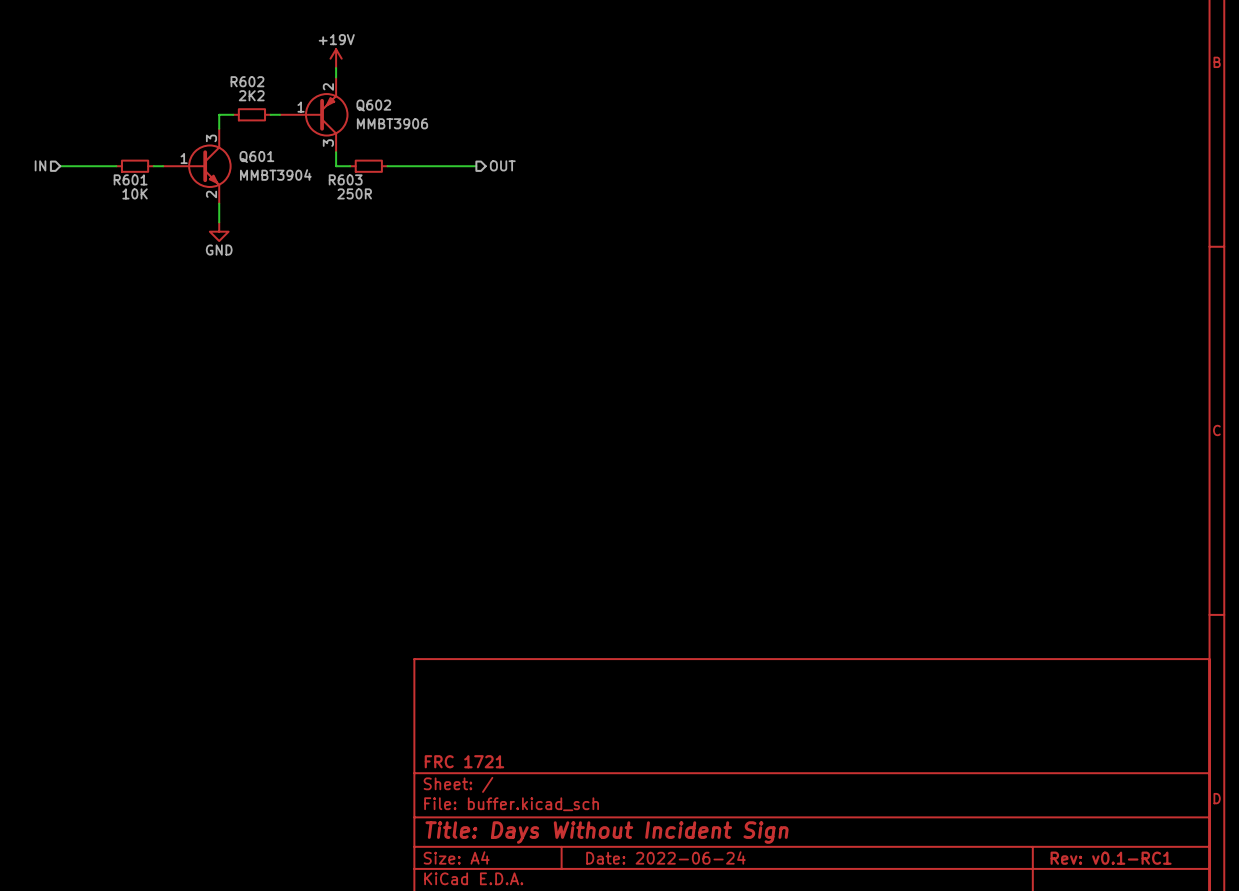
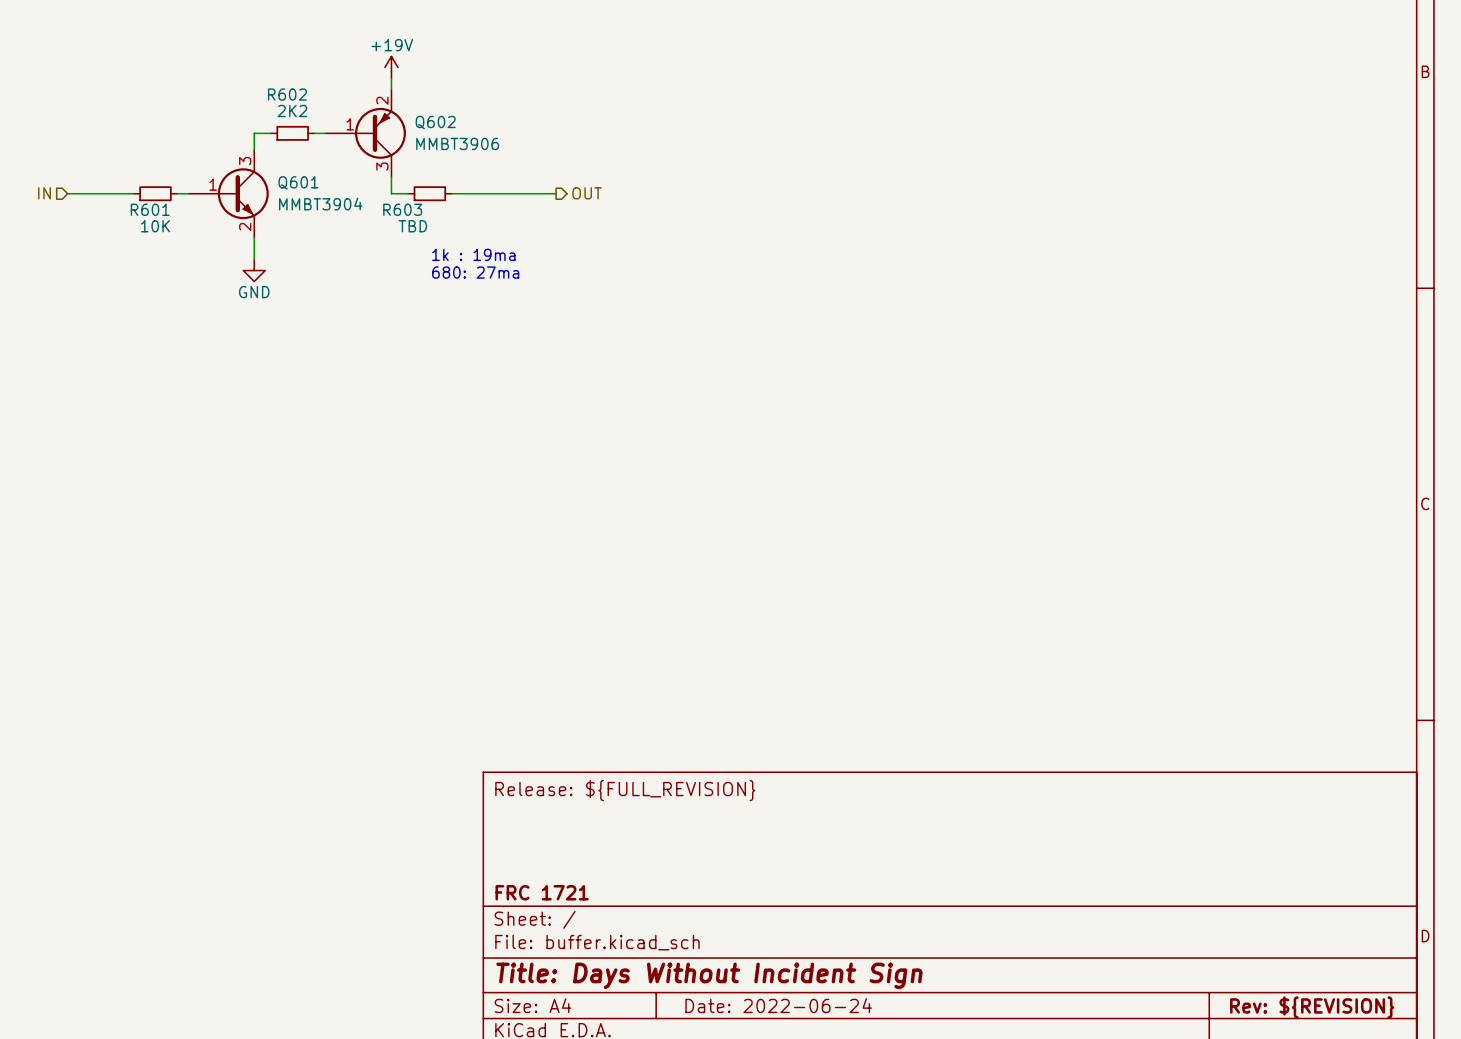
R603 value: 250R (354, 193) -> TBD (412, 226)
text: none -> 1k : 19ma (473, 254)
text: none -> 680: 27ma (475, 272)
title block: none -> Release: ${FULL_REVISION} (625, 790)
title block: Rev: v0.1-RC1 (1111, 858) -> Rev: ${REVISION} (1312, 1007)

